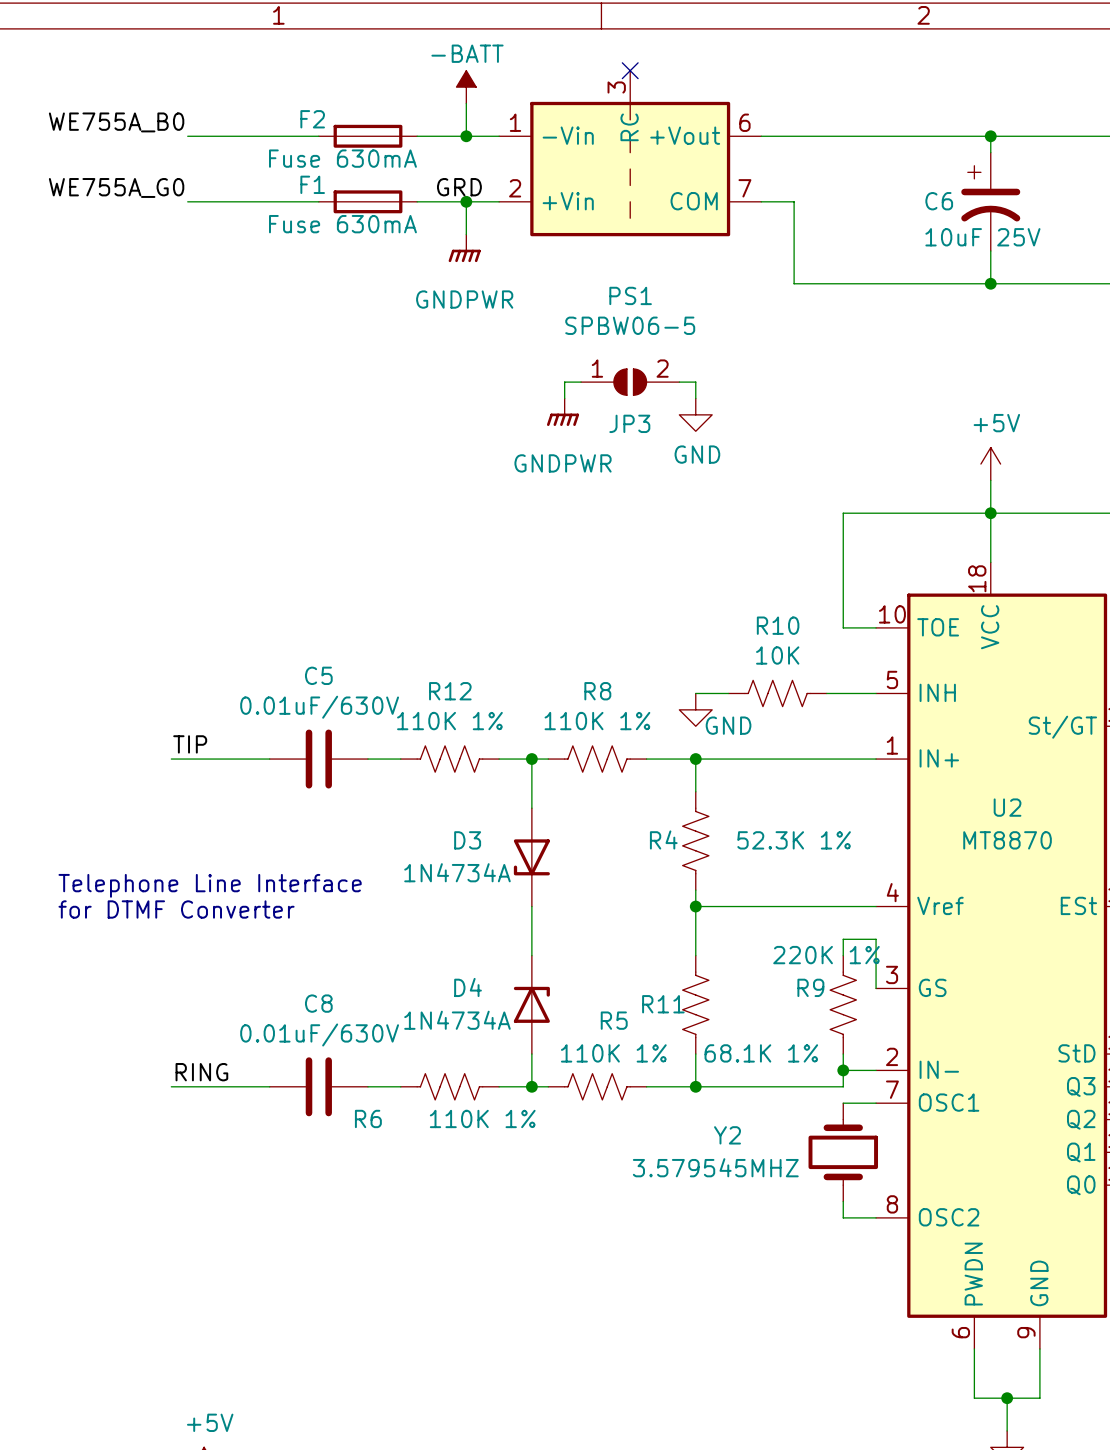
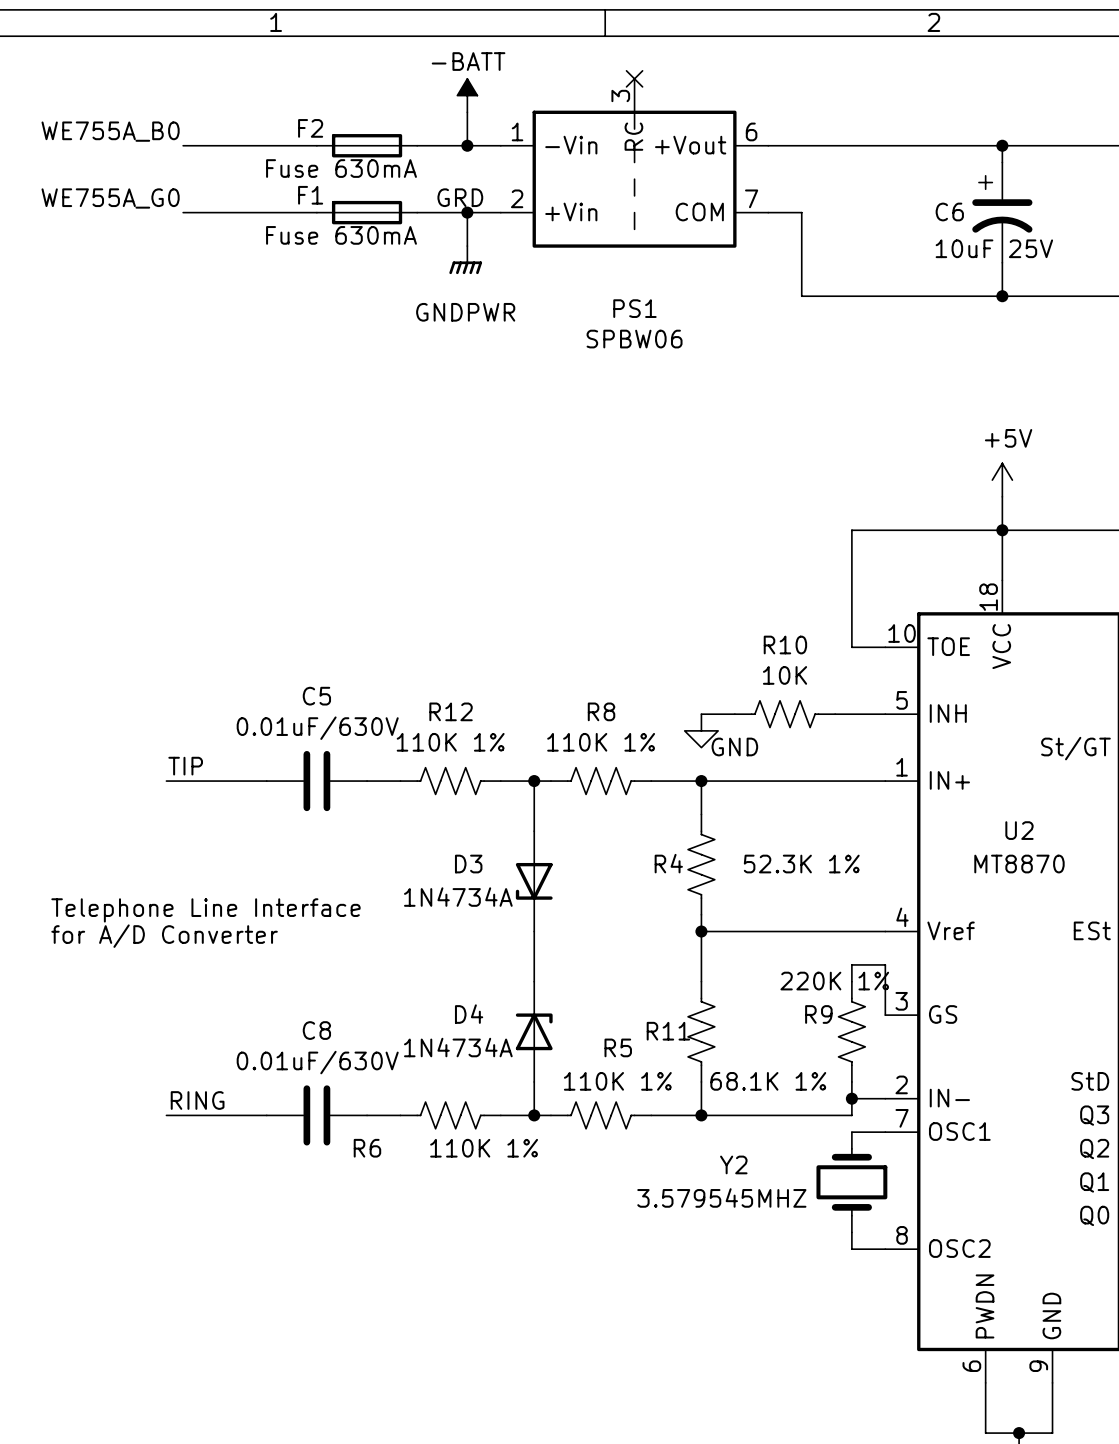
PS1 value: SPBW06-5 (630, 325) -> SPBW06 (634, 339)
wire: (581, 382) (564, 382) (564, 398) -> none
JP3: (630, 382) -> none
wire: (679, 382) (695, 382) (695, 398) -> none
power symbol: GNDPWR (563, 412) -> none
power symbol: GND (695, 414) -> none
text: for DTMF Converter (176, 909) -> for A/D Converter (164, 936)

